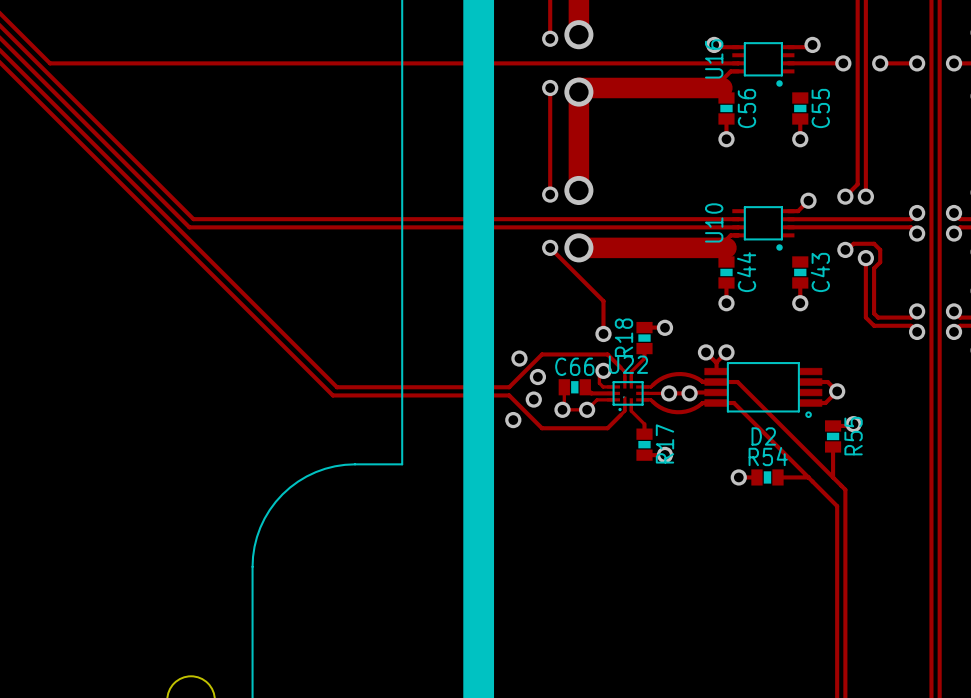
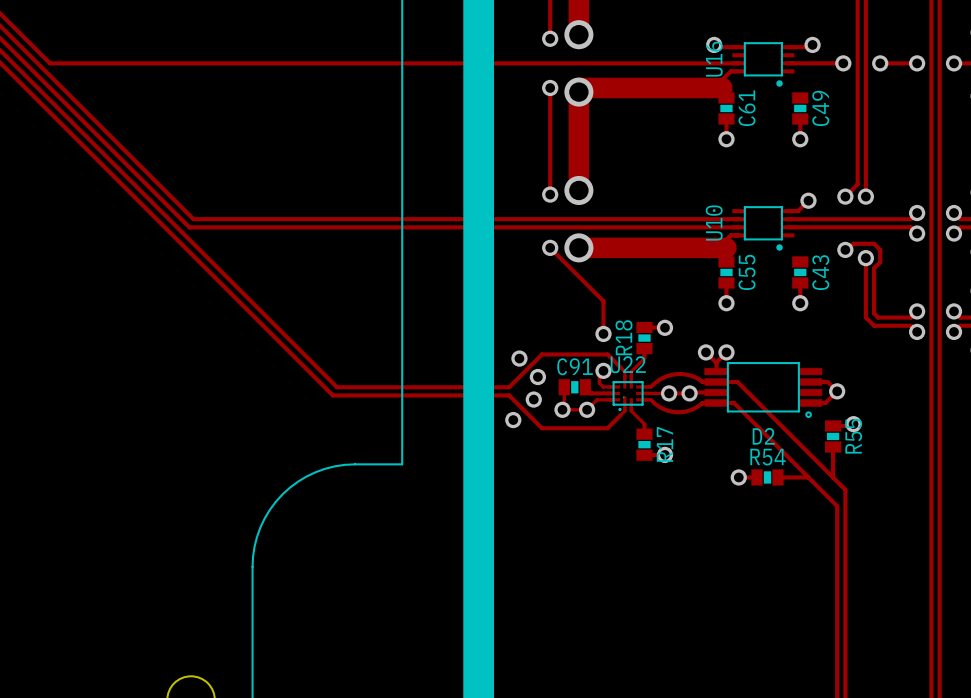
C56 name: C56 (746, 108) -> C61 (746, 108)
C55 name: C55 (820, 108) -> C49 (820, 108)
C44 name: C44 (746, 272) -> C55 (746, 272)
C66 name: C66 (574, 366) -> C91 (575, 366)

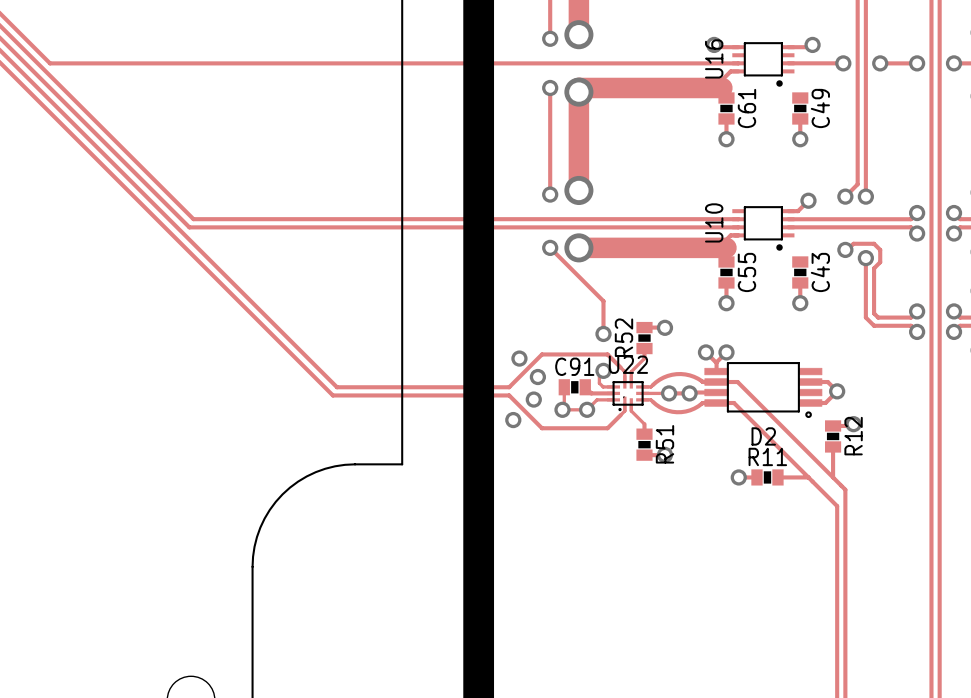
R18 name: R18 (623, 337) -> R52 (623, 337)
R55 name: R55 (853, 436) -> R12 (853, 436)
R17 name: R17 (664, 444) -> R51 (664, 444)
R54 name: R54 (768, 457) -> R11 (767, 456)

